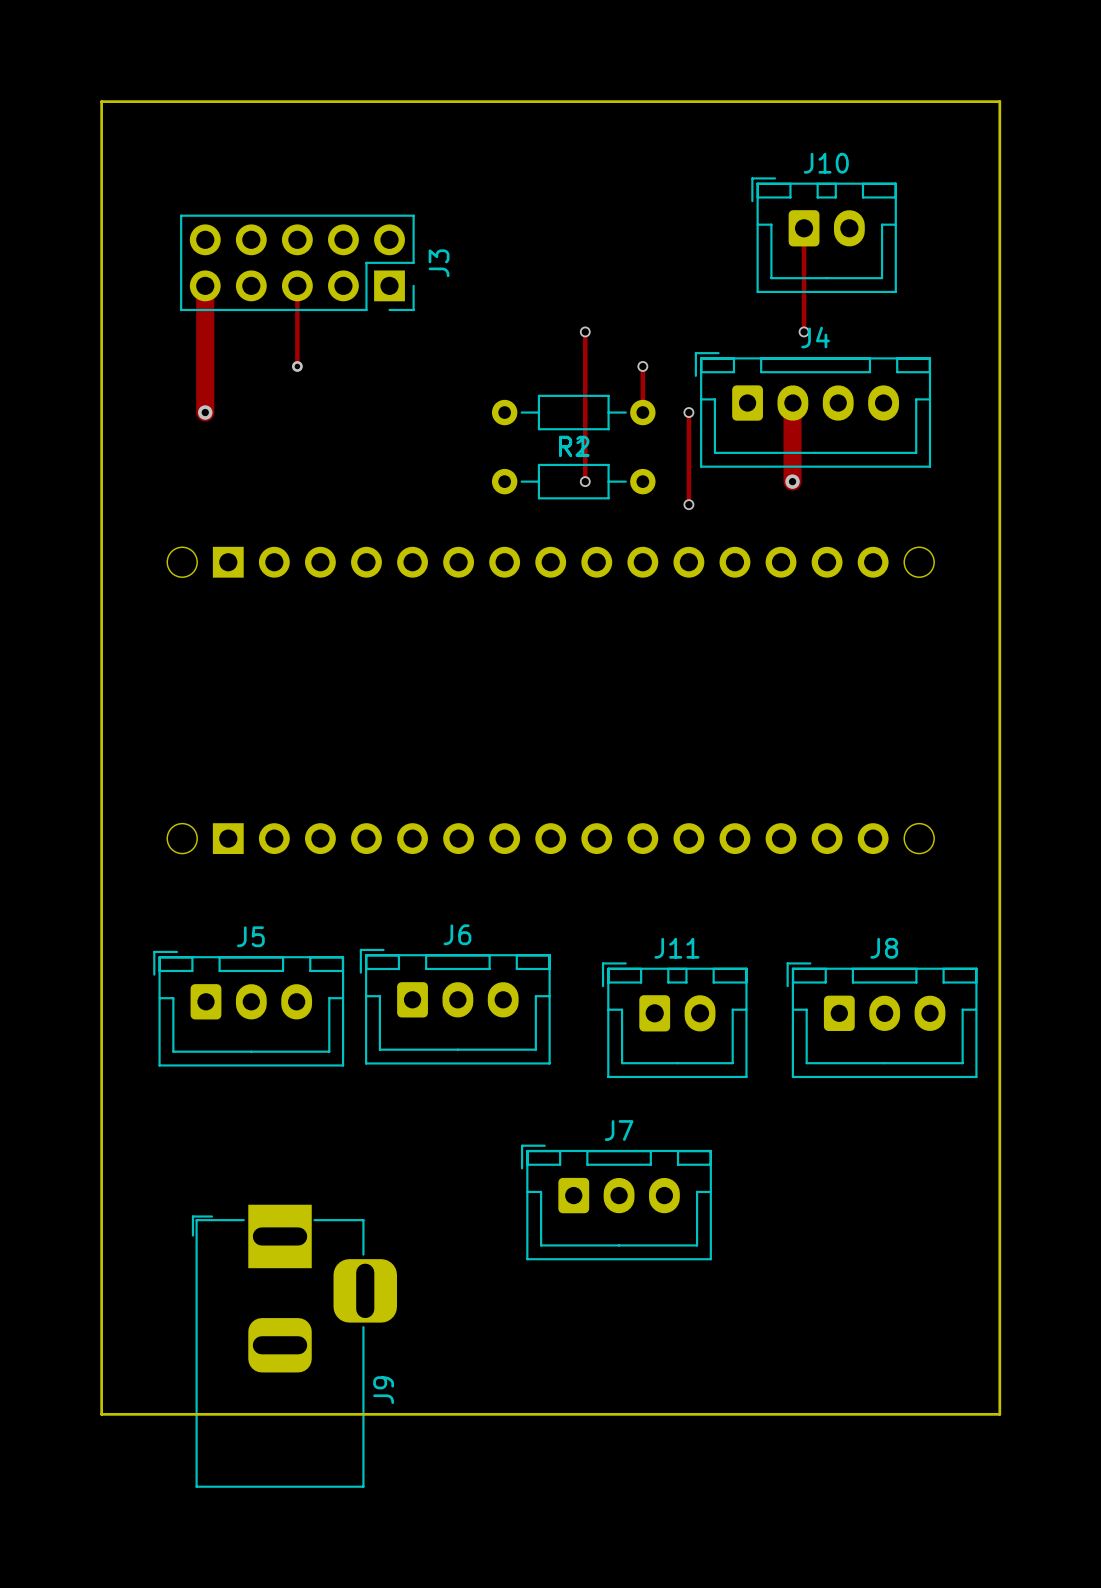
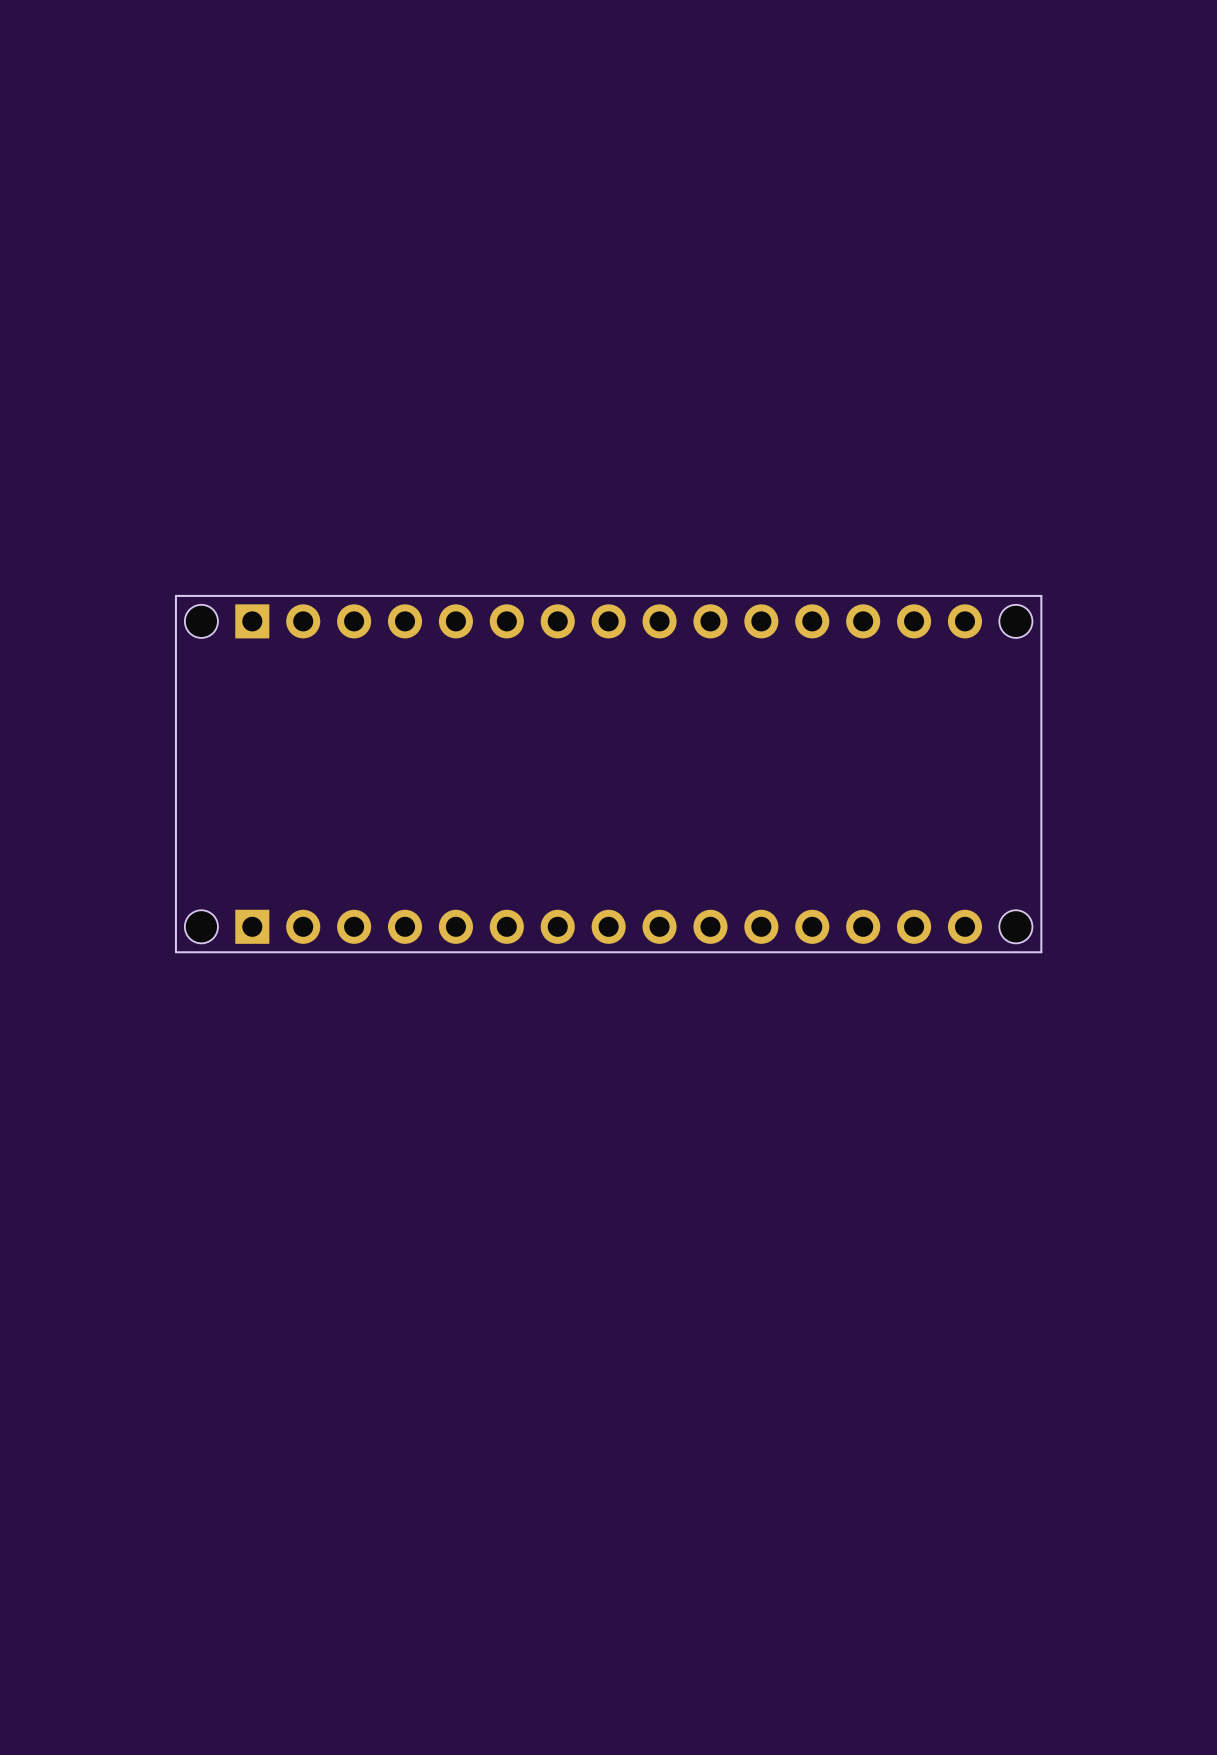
board edge: (101, 101) (999, 101) (999, 1414) (101, 1414) (101, 101) -> none
track: (804, 228) (804, 331) -> none
J10: (824, 235) -> none
J3: (297, 262) -> none
track: (205, 285) (205, 412) -> none
track: (297, 285) (297, 366) -> none
track: (585, 331) (585, 481) -> none
via: (585, 331) -> none
via: (804, 331) -> none
via: (297, 366) -> none
track: (642, 366) (642, 412) -> none
via: (642, 366) -> none
track: (792, 403) (792, 481) -> none
J4: (812, 409) -> none
via: (205, 412) -> none
part: (573, 412) -> none
track: (688, 412) (688, 504) -> none
via: (688, 412) -> none
part: (573, 481) -> none
via: (585, 481) -> none
via: (792, 481) -> none
via: (688, 504) -> none
board edge: none -> (175, 595) (1041, 595) (1041, 952) (175, 952) (175, 595)
J6: (455, 1006) -> none
J5: (248, 1008) -> none
J11: (674, 1020) -> none
J8: (882, 1020) -> none
J7: (616, 1202) -> none
J9: (294, 1346) -> none

